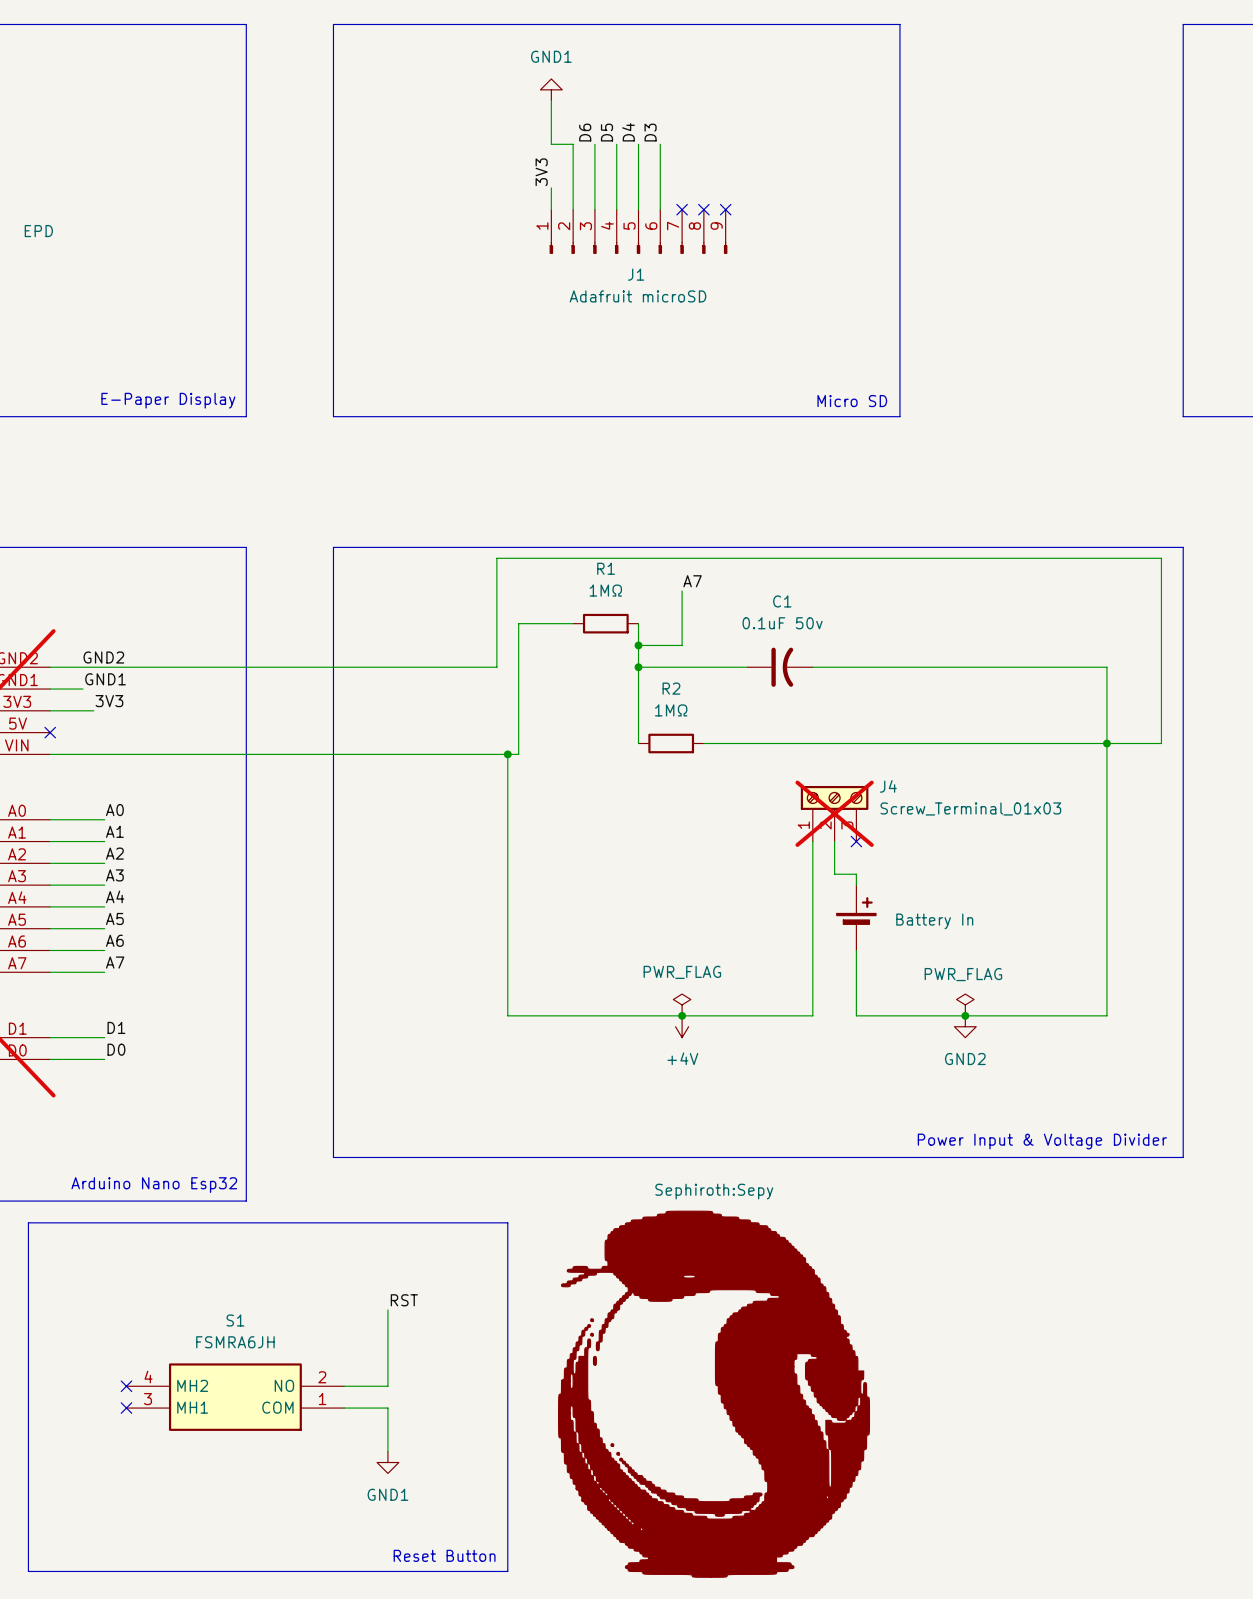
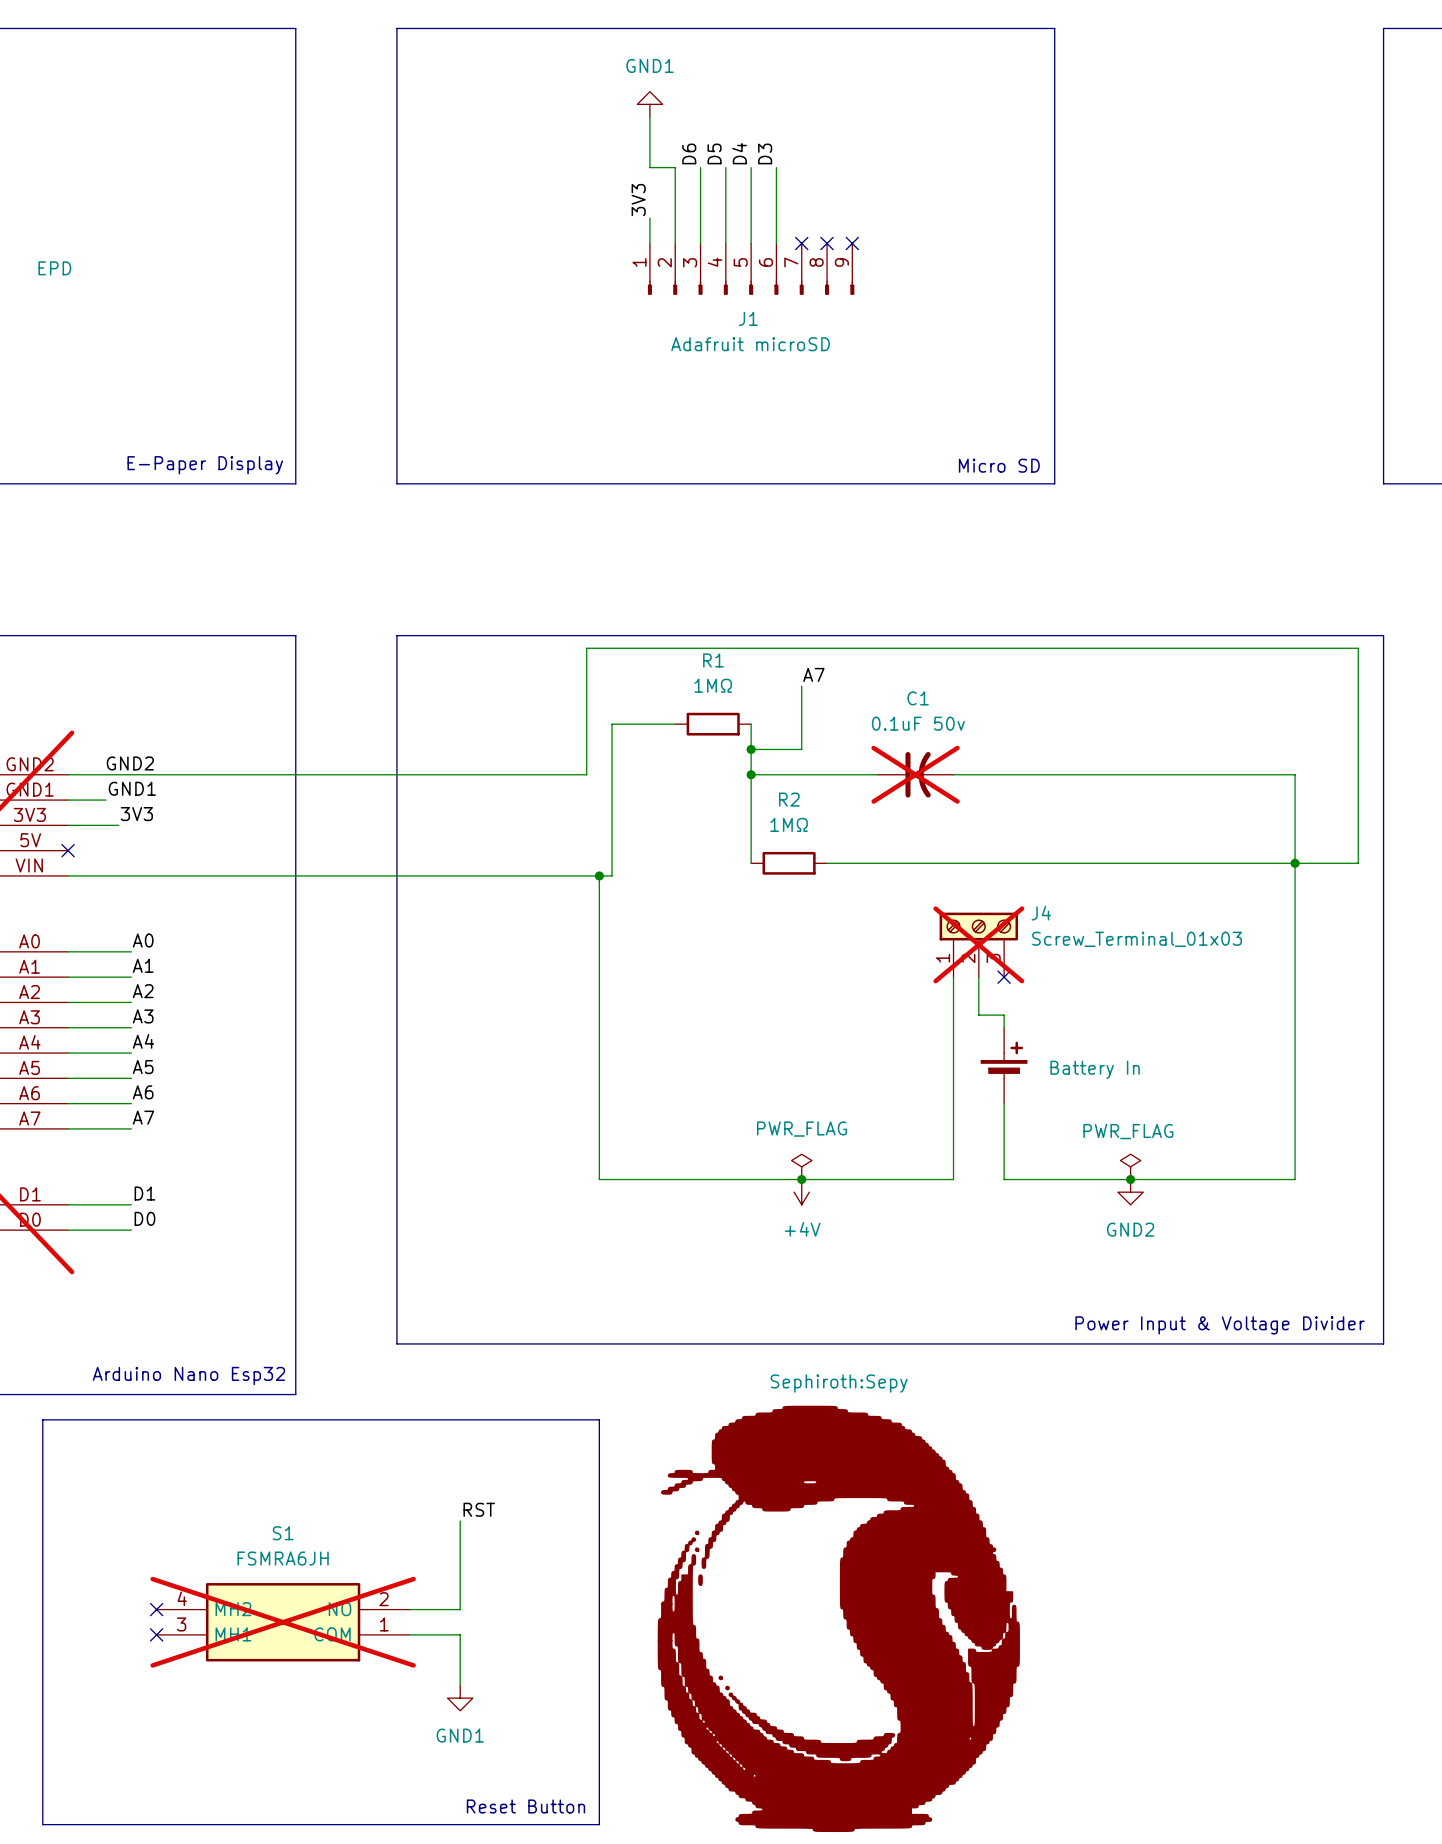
C1 do-not-place cross: none -> (915, 774)
S1 do-not-place cross: none -> (283, 1622)

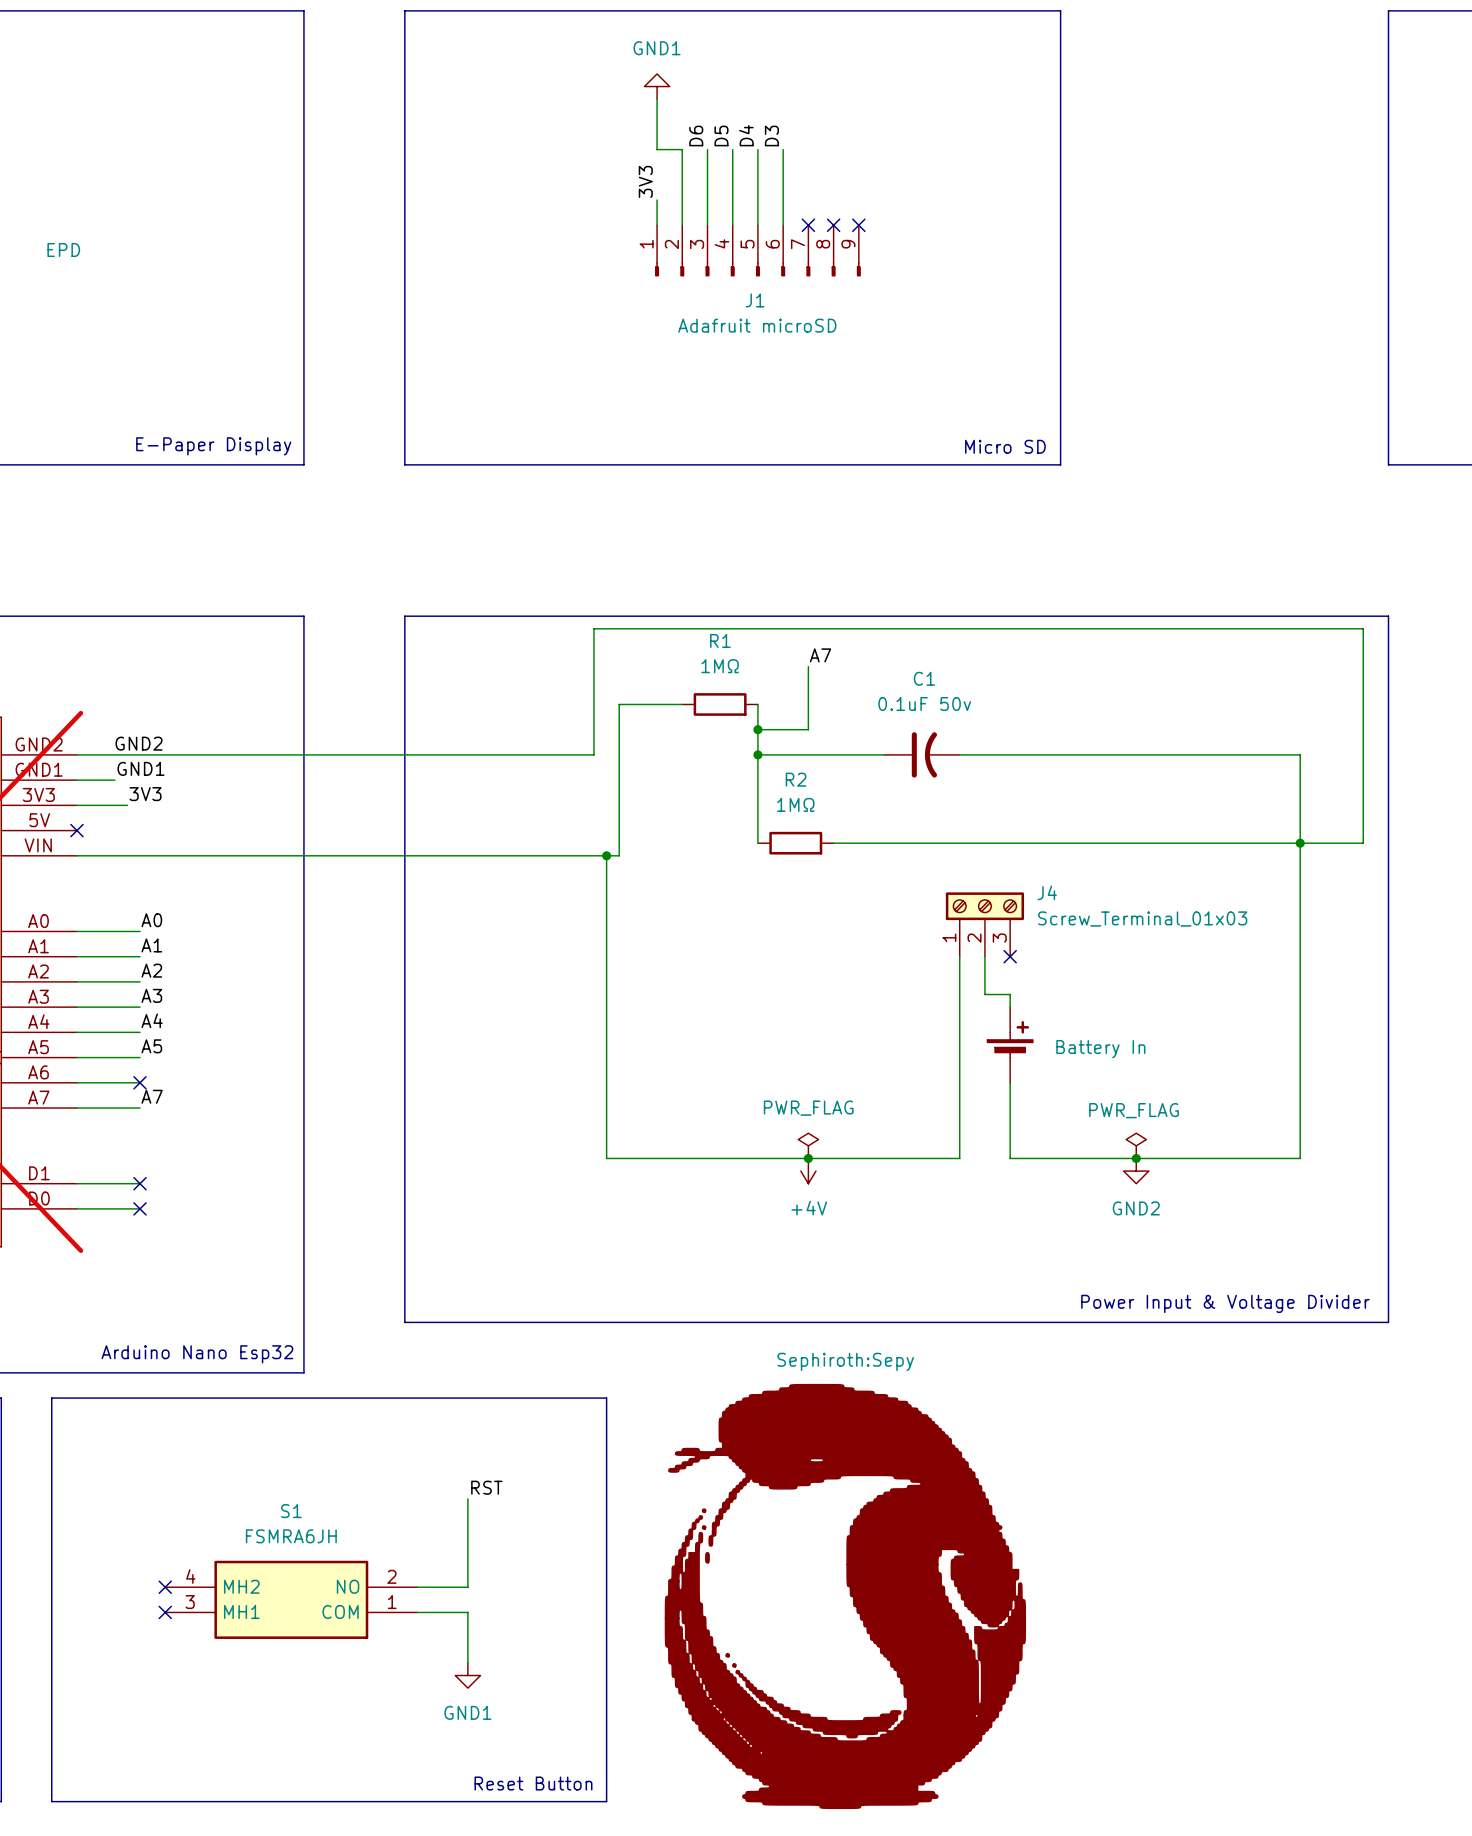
C1 do-not-place cross: (915, 774) -> none
J4 do-not-place cross: (978, 944) -> none
label: A6 (143, 1092) -> none
no-connect mark: none -> (140, 1082)
label: D1 (144, 1193) -> none
no-connect mark: none -> (140, 1183)
label: D0 (144, 1218) -> none
no-connect mark: none -> (140, 1208)
S1 do-not-place cross: (283, 1622) -> none

